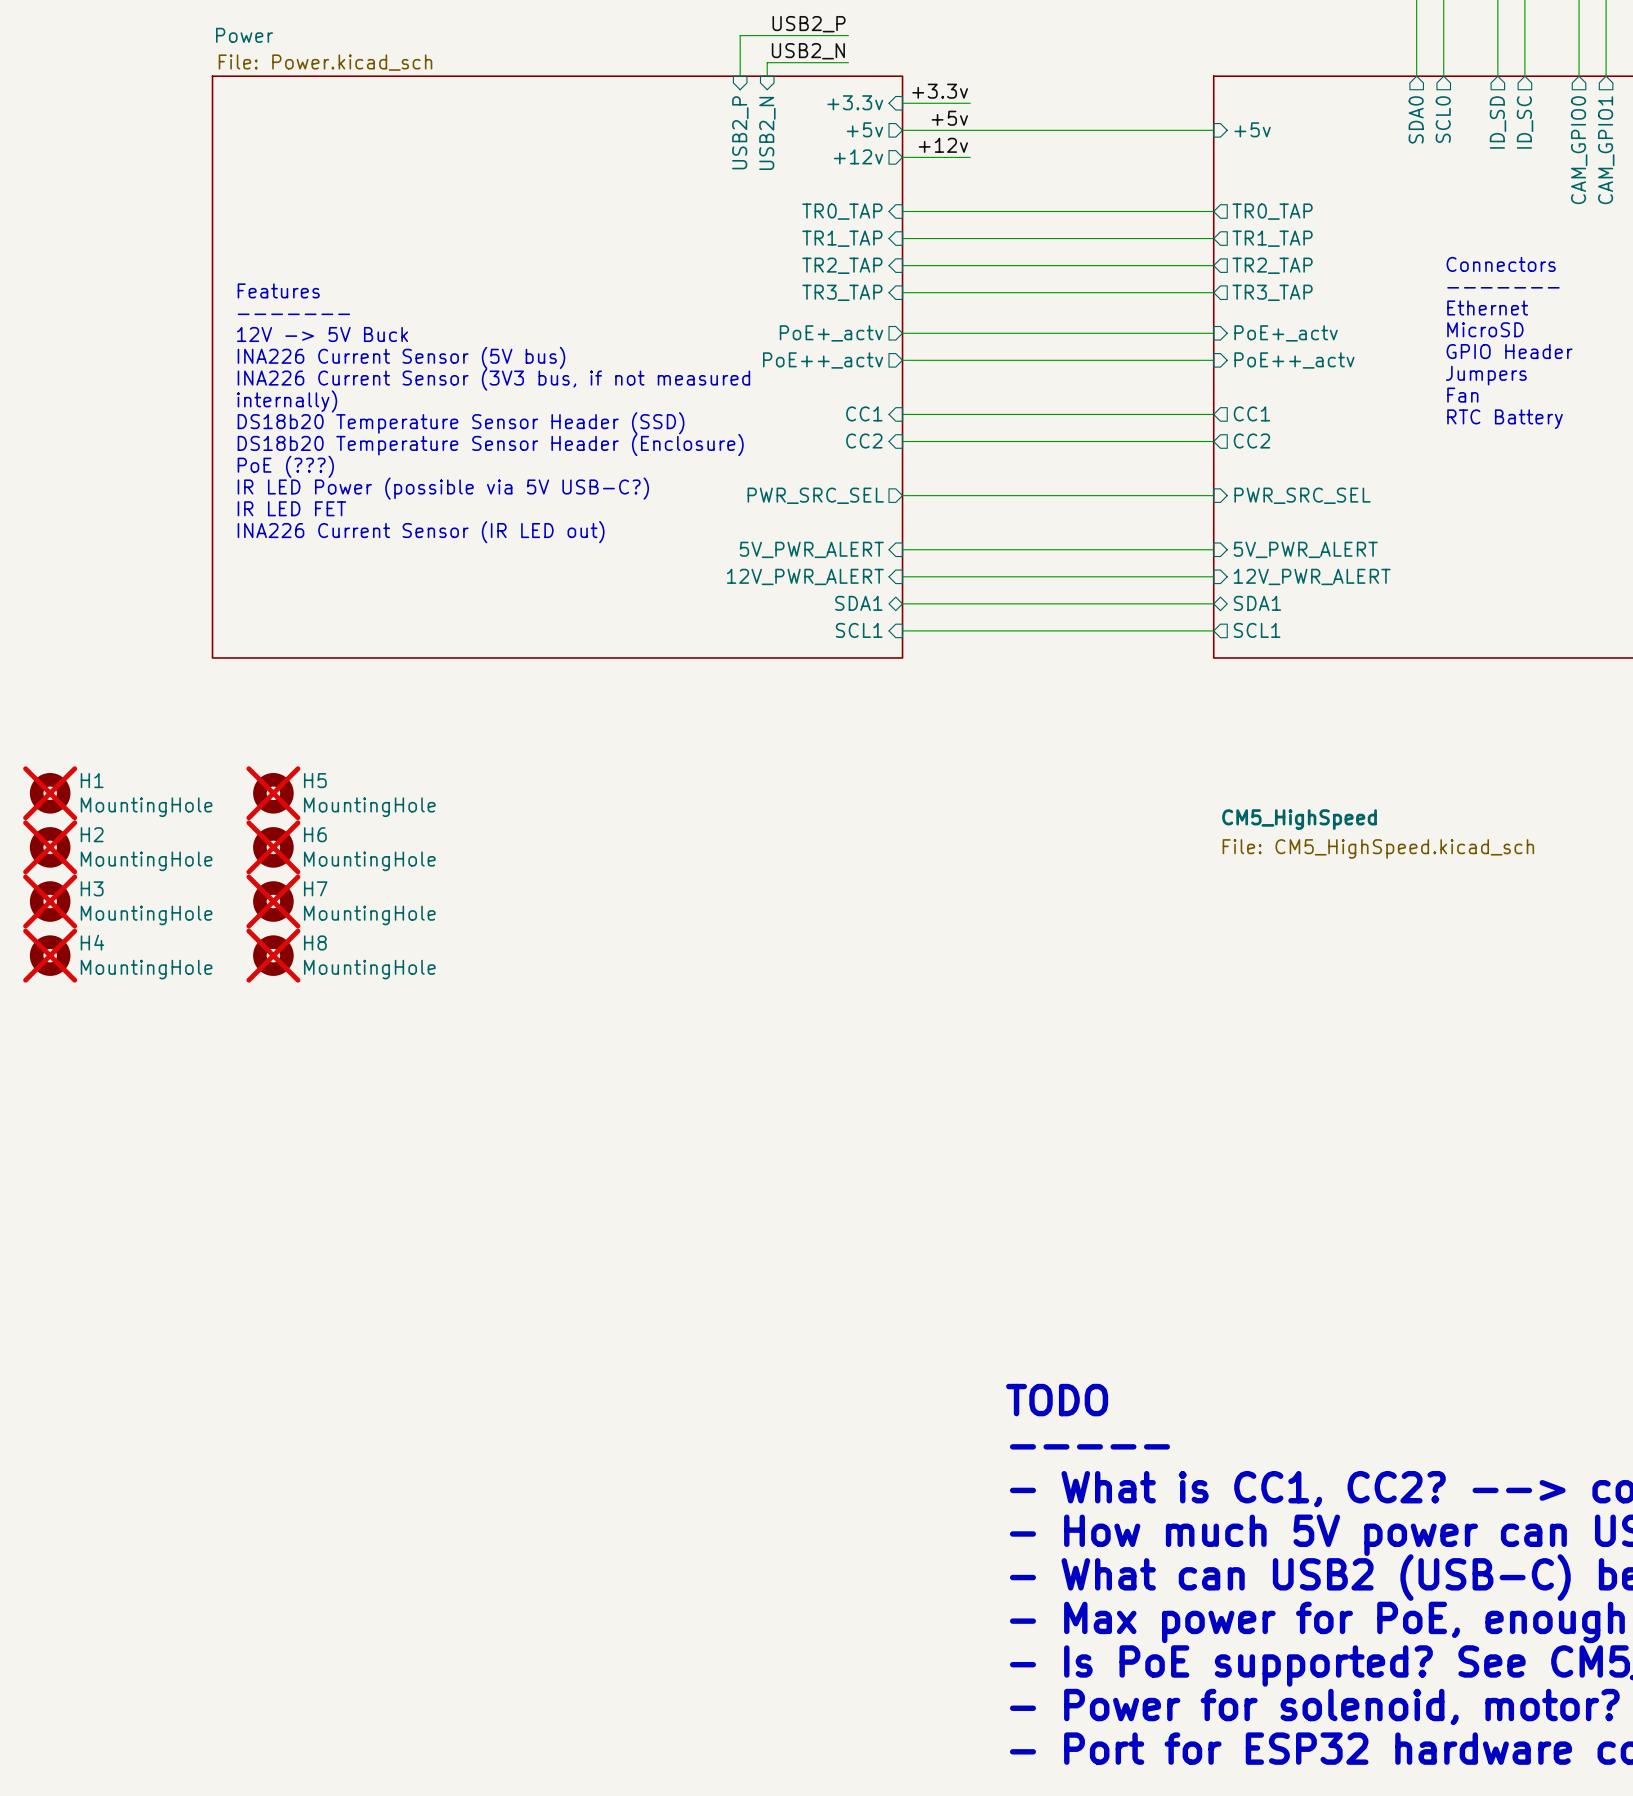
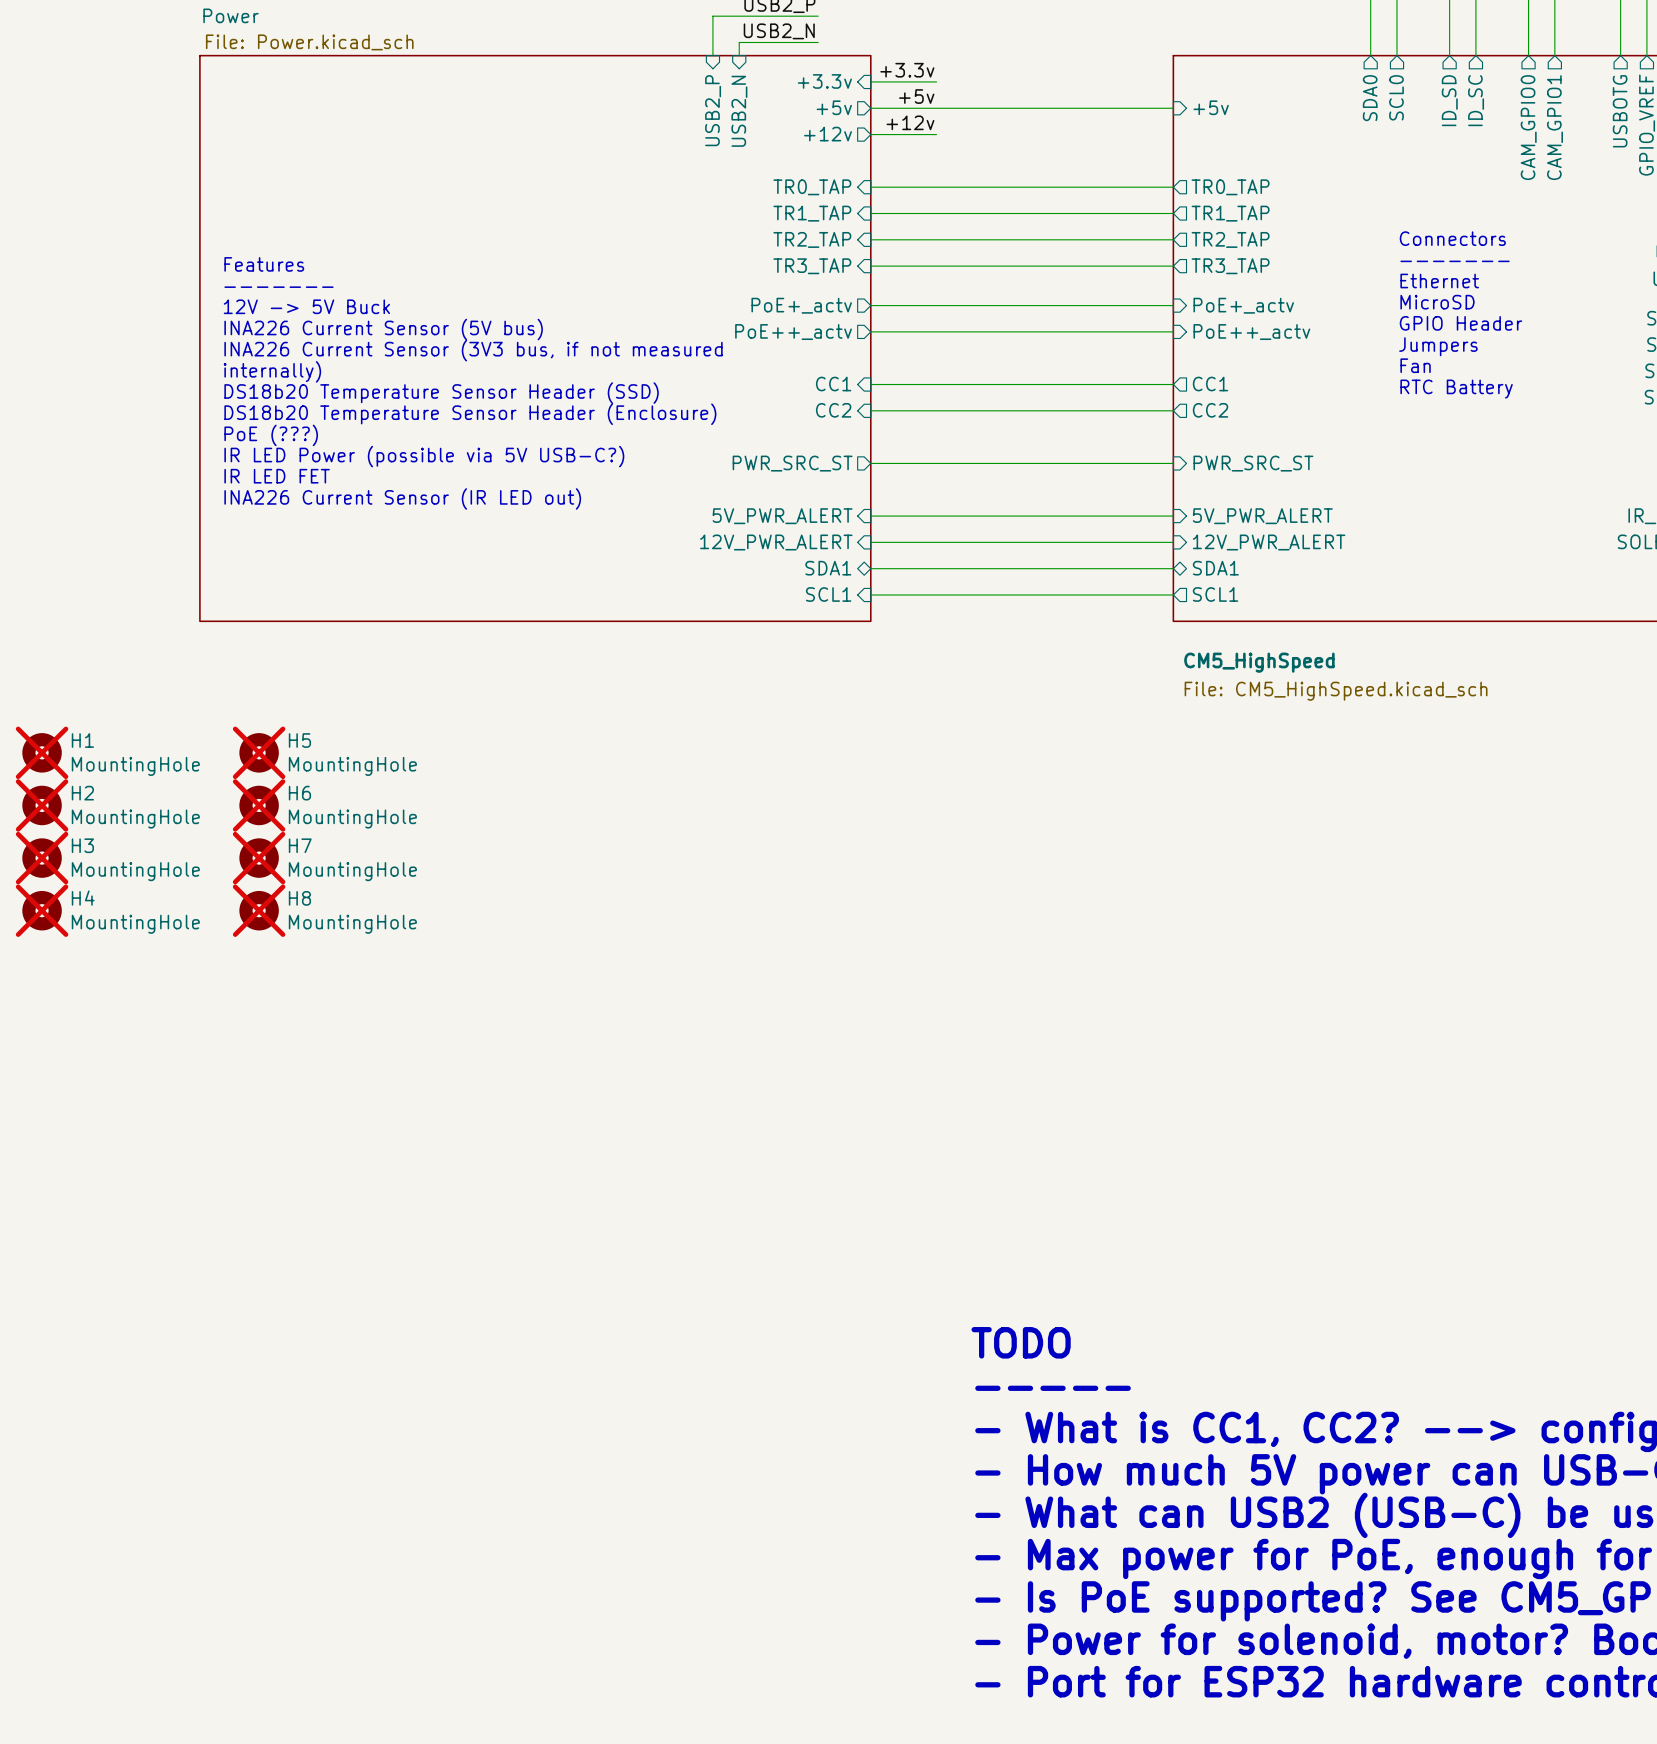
sheet pin: PWR_SRC_SEL (815, 495) -> PWR_SRC_ST (792, 463)
sheet pin: PWR_SRC_SEL (1302, 495) -> PWR_SRC_ST (1253, 463)
sheet CM5_HighSpeed name position: CM5_HighSpeed (1299, 819) -> CM5_HighSpeed (1259, 662)
sheet CM5_HighSpeed value position: File: CM5_HighSpeed.kicad_sch (1378, 848) -> File: CM5_HighSpeed.kicad_sch (1336, 691)

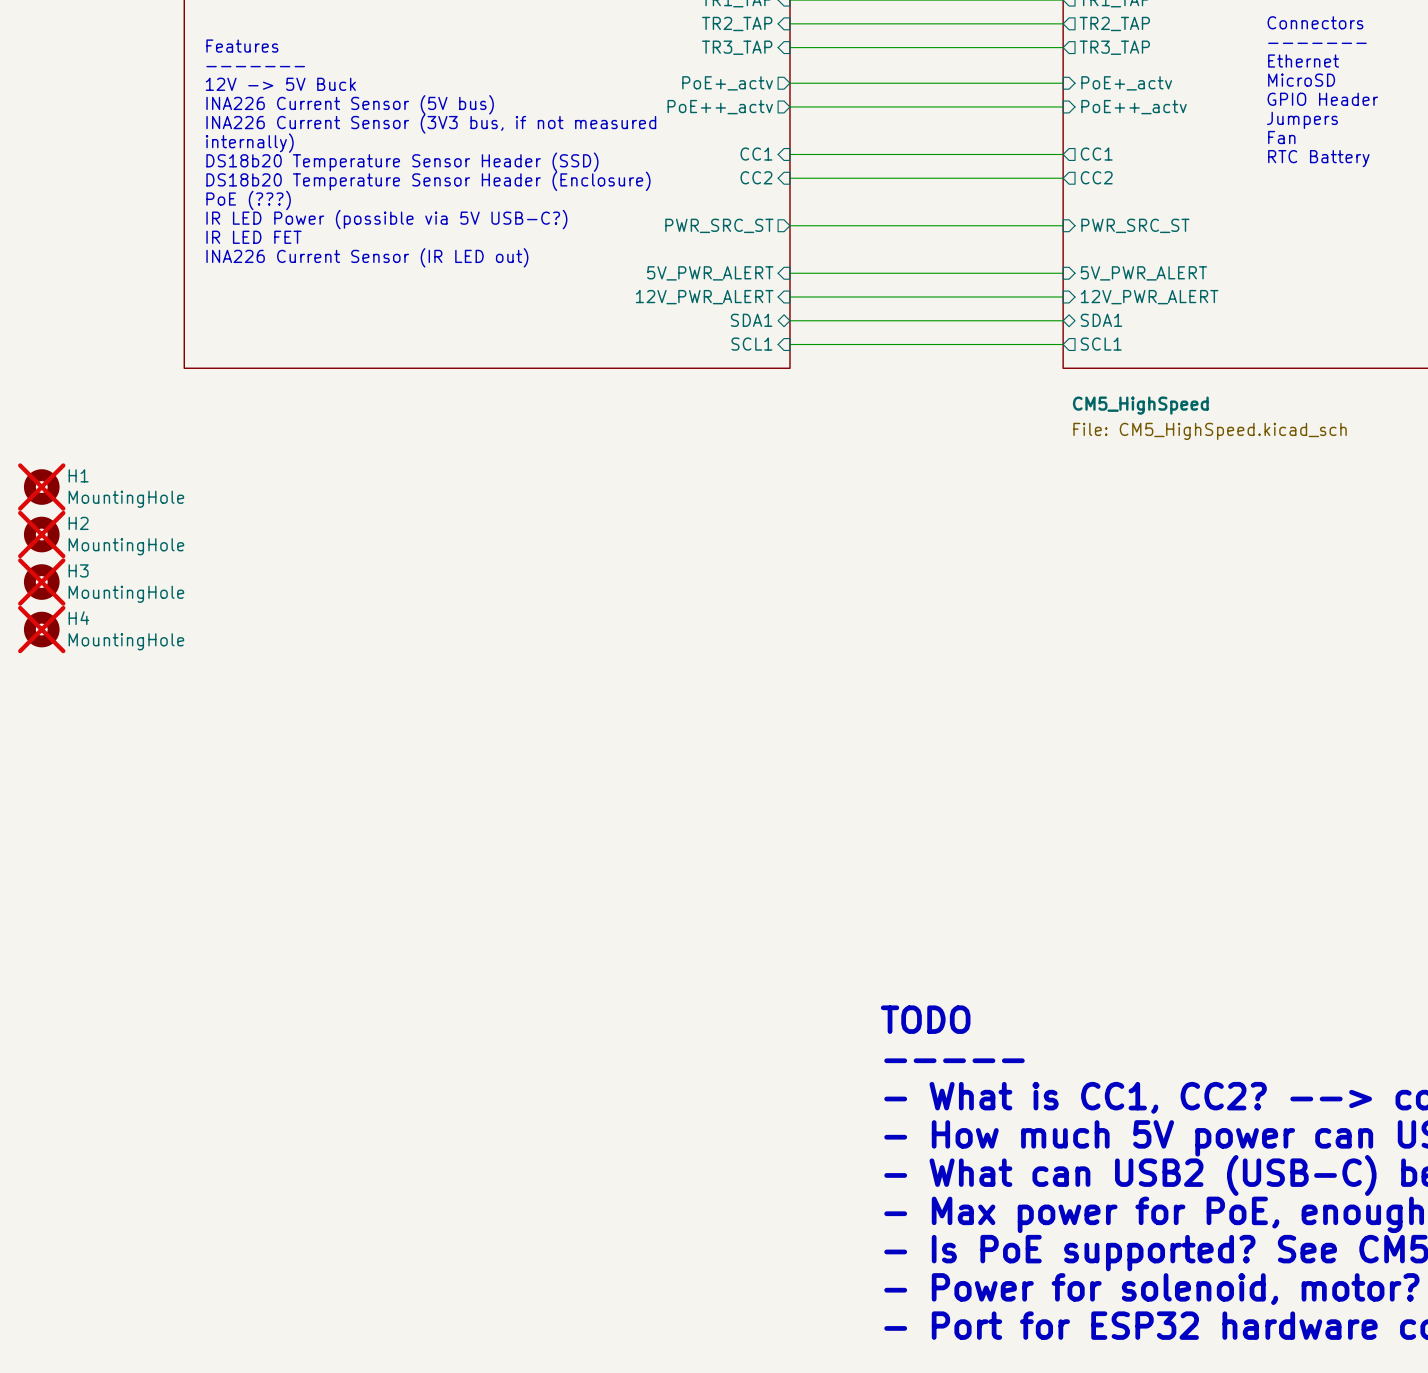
H5: MountingHole (259, 752) -> none
H6: MountingHole (259, 805) -> none
H7: MountingHole (259, 858) -> none
H8: MountingHole (259, 910) -> none

